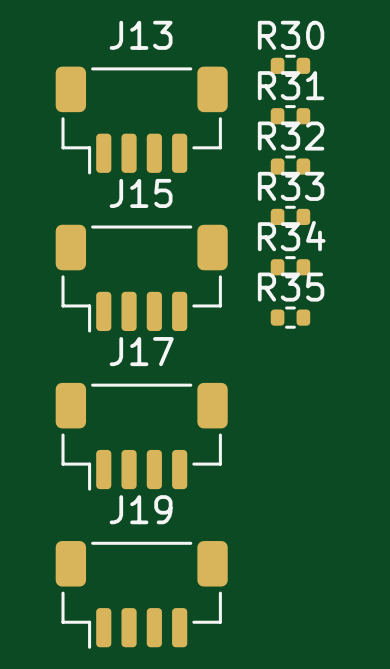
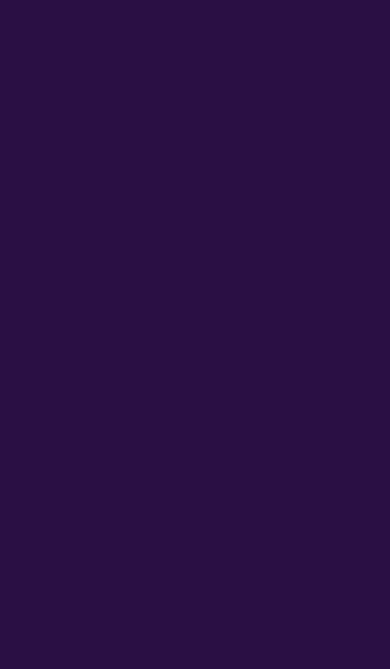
R30: (290, 65) -> none
R31: (290, 116) -> none
J13: (141, 120) -> none
R32: (290, 166) -> none
R33: (290, 216) -> none
R34: (290, 267) -> none
J15: (141, 278) -> none
R35: (290, 317) -> none
J17: (141, 436) -> none
J19: (141, 594) -> none

